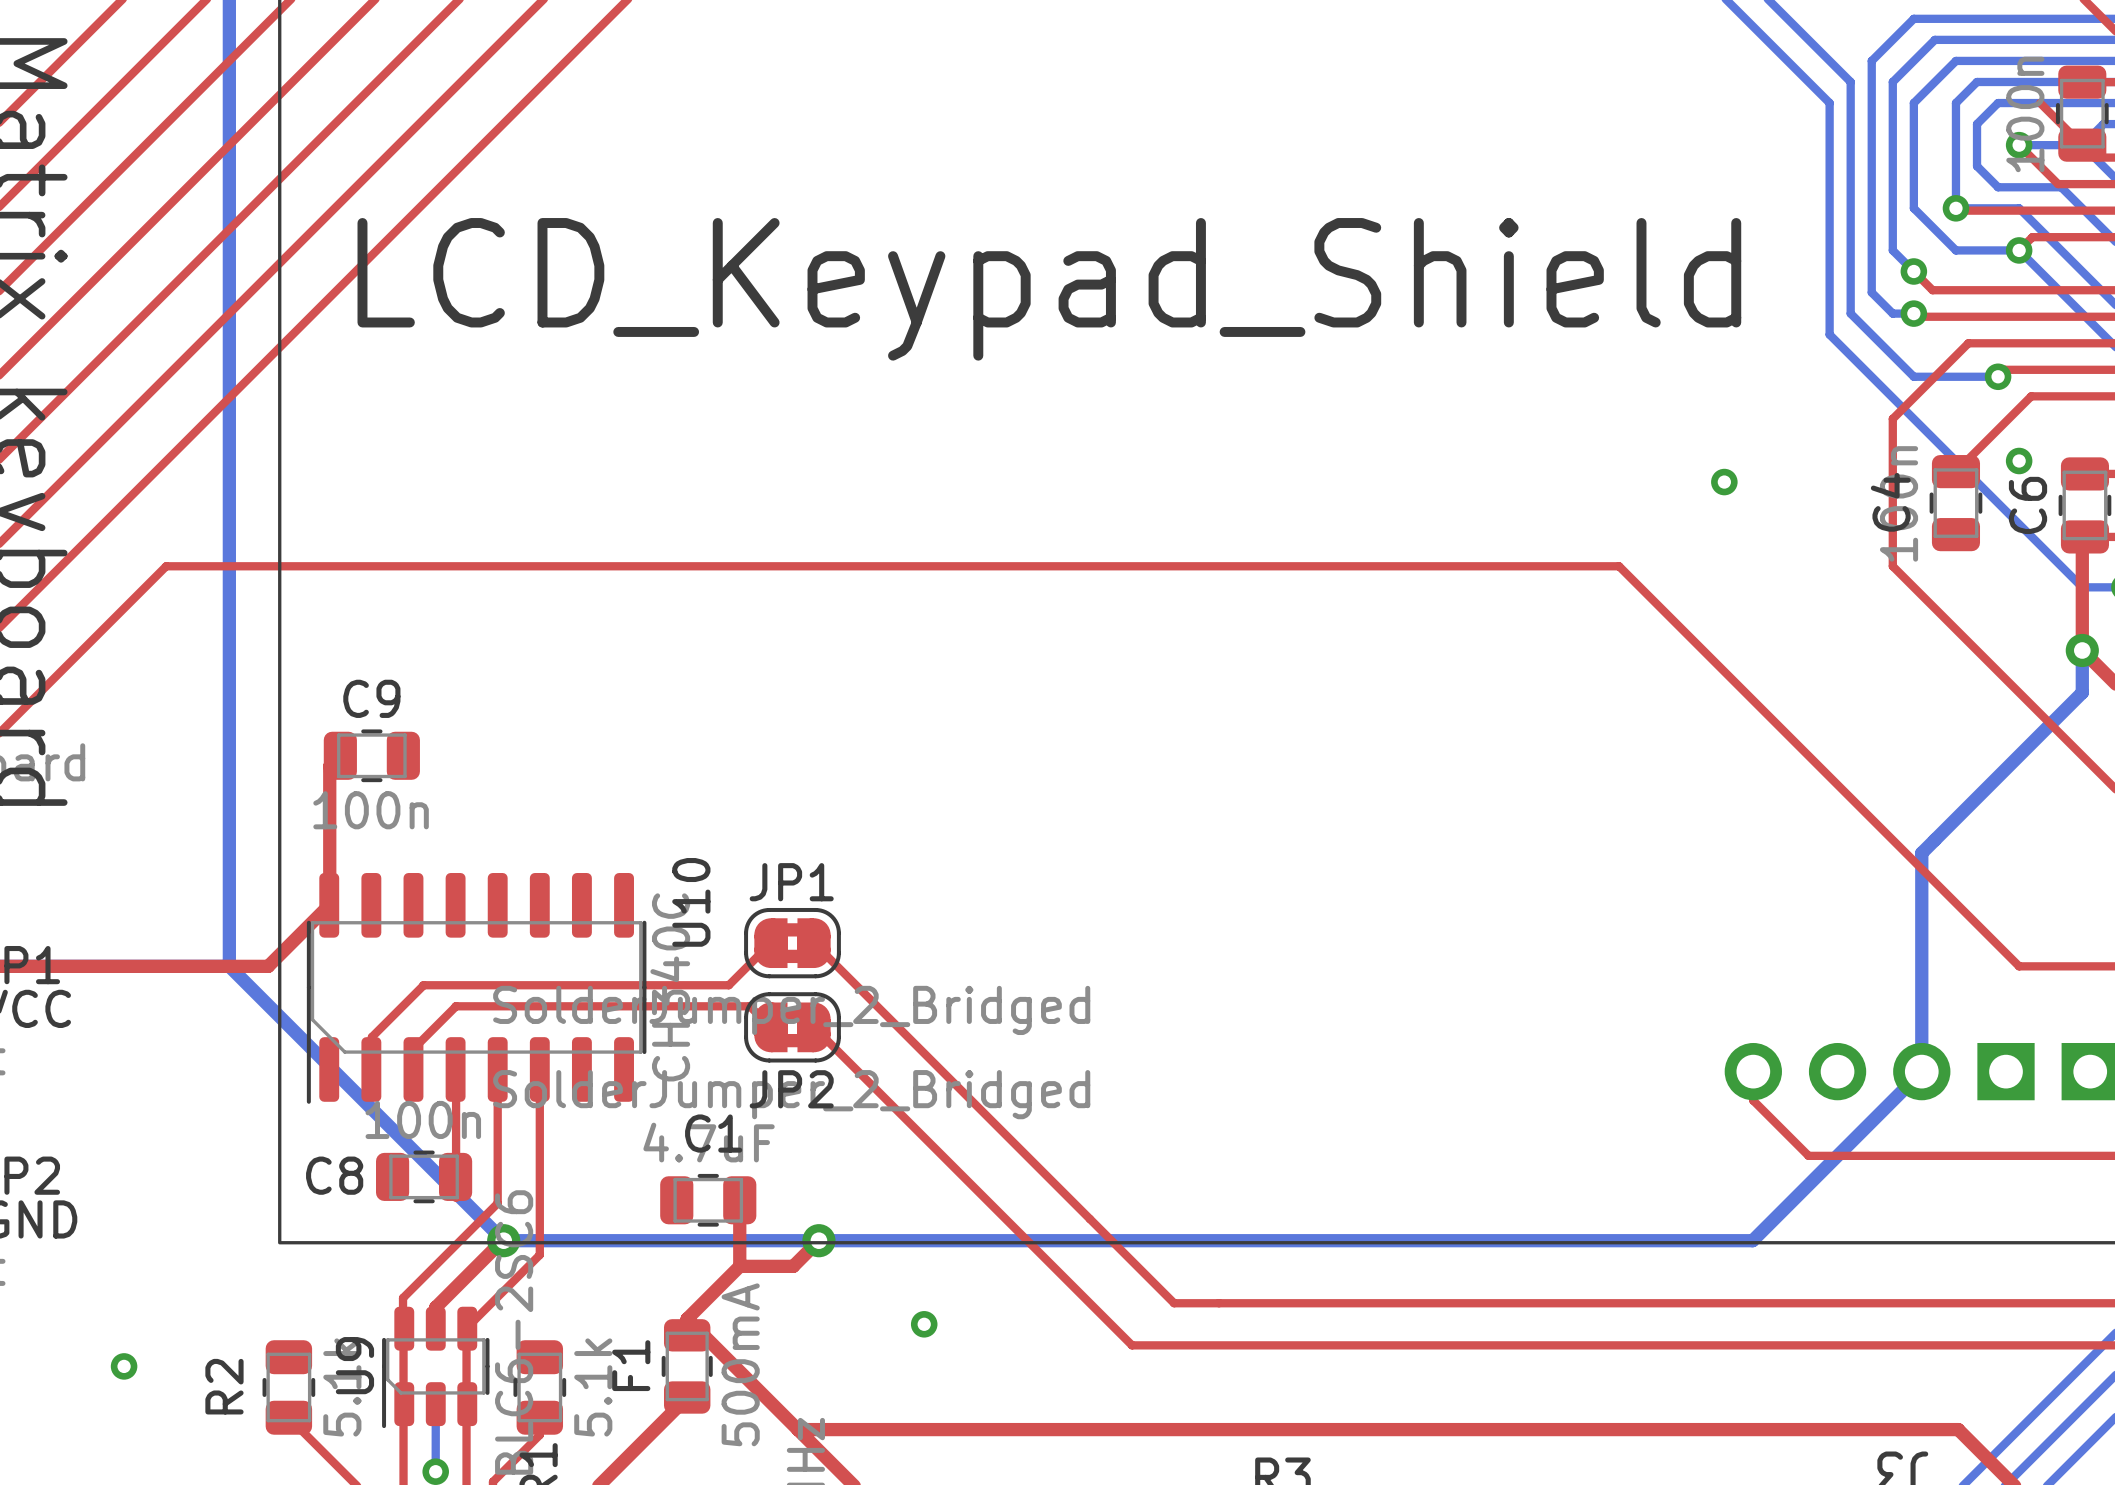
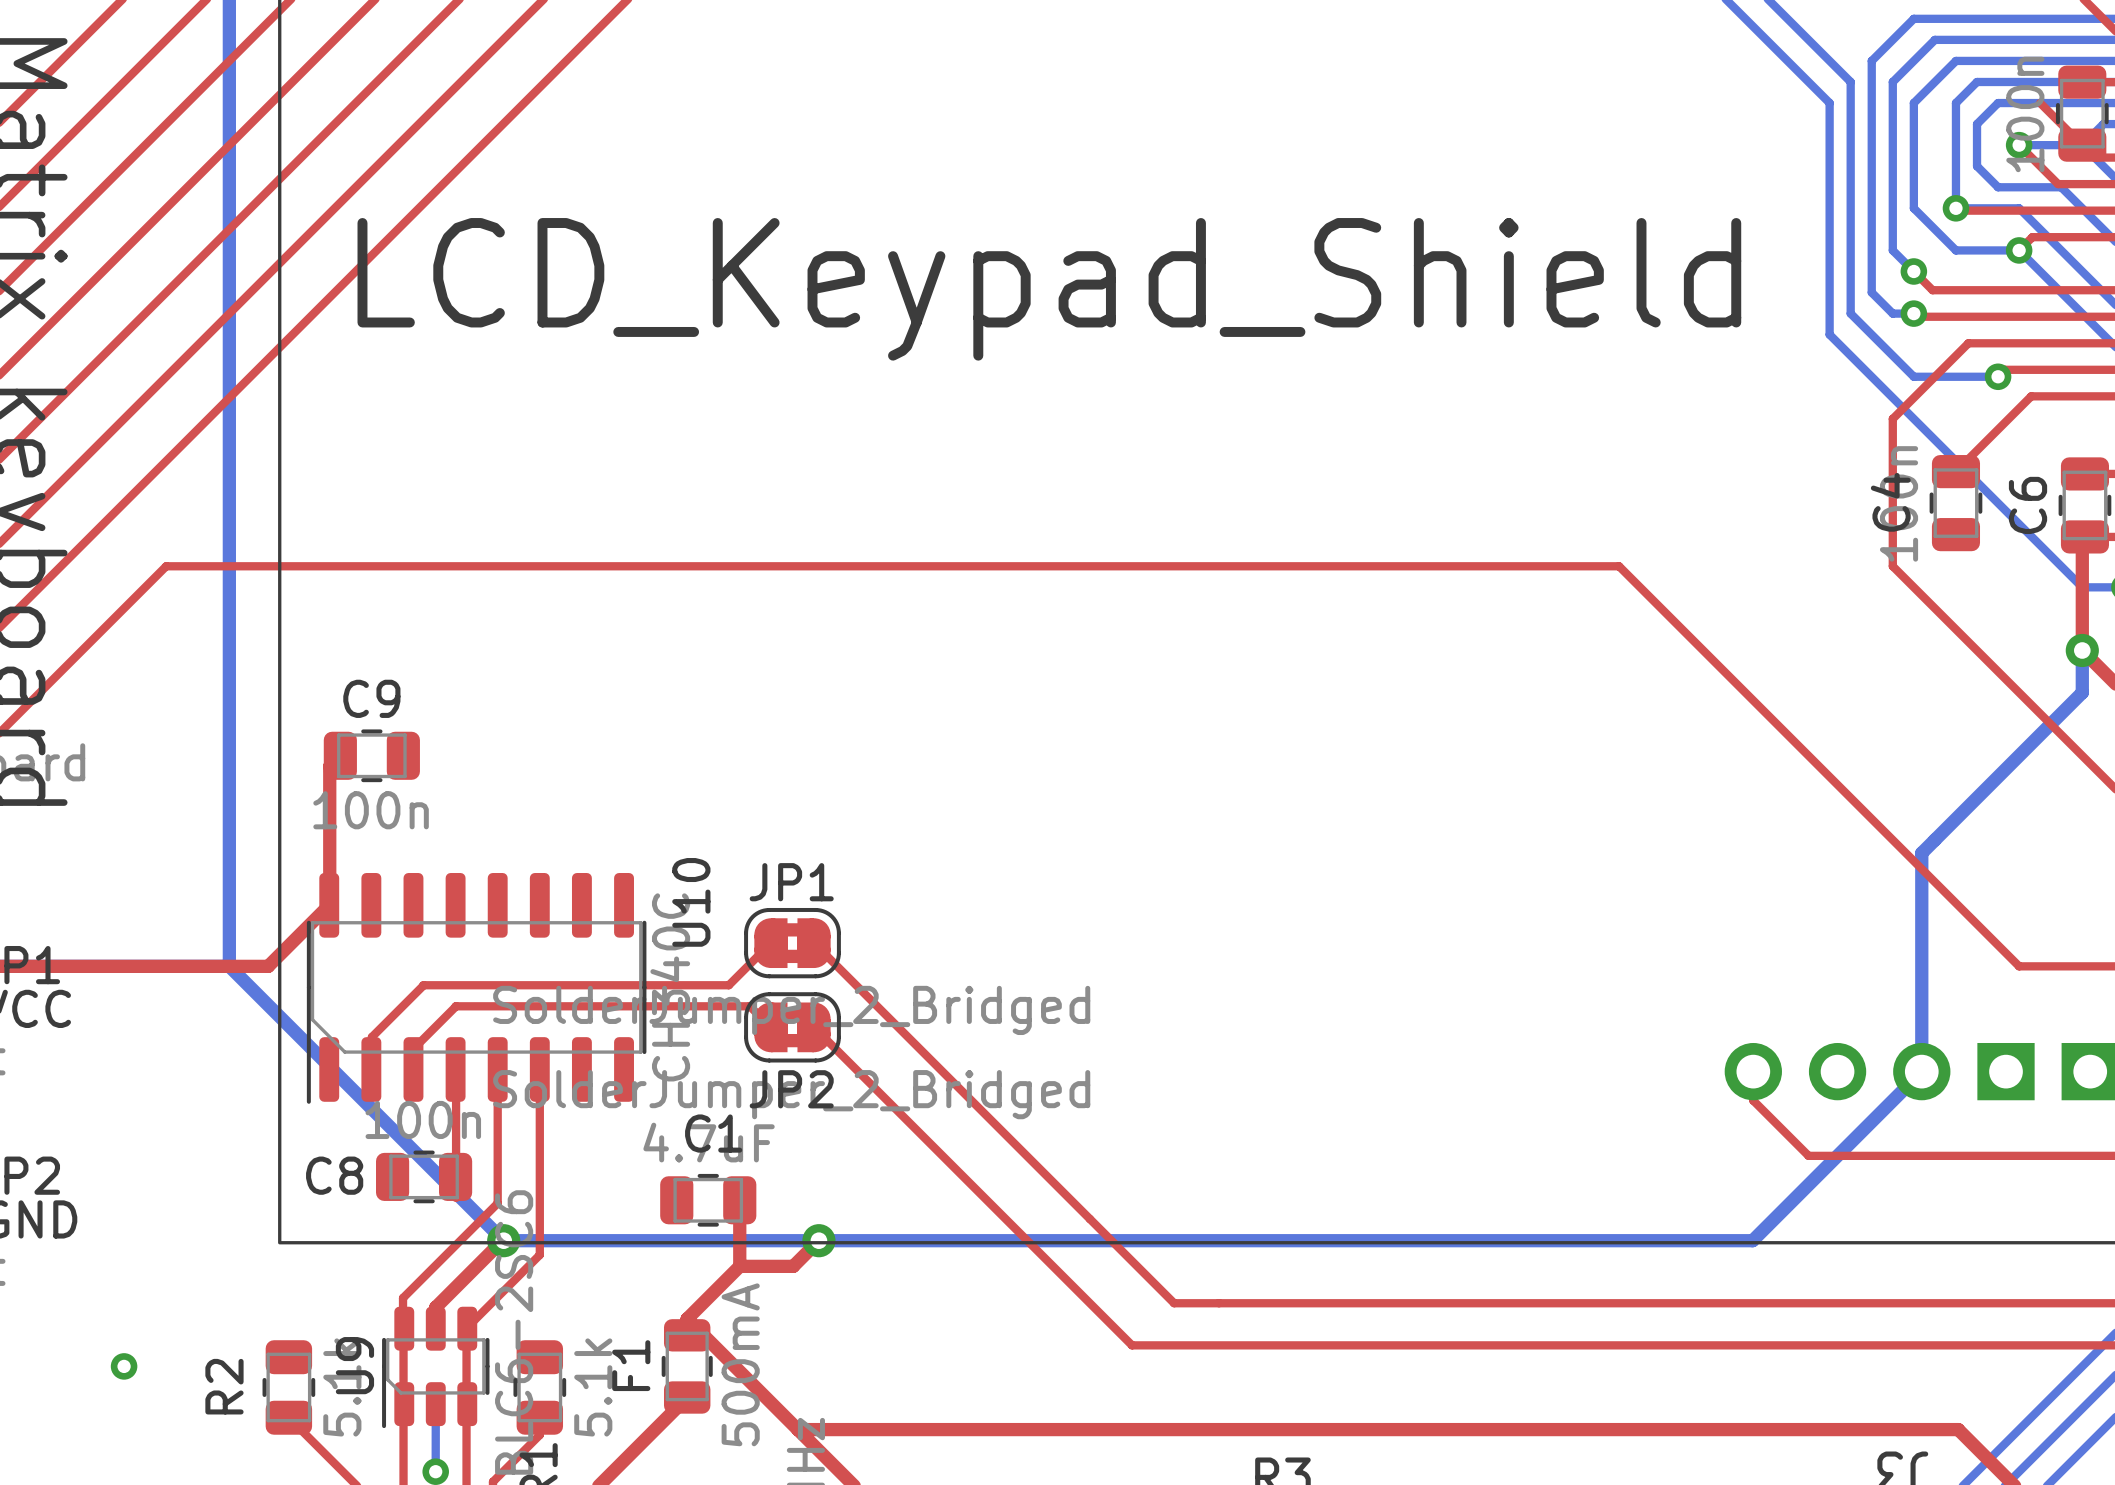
via: (2019, 460) -> none
via: (1724, 482) -> none
via: (924, 1324) -> none

